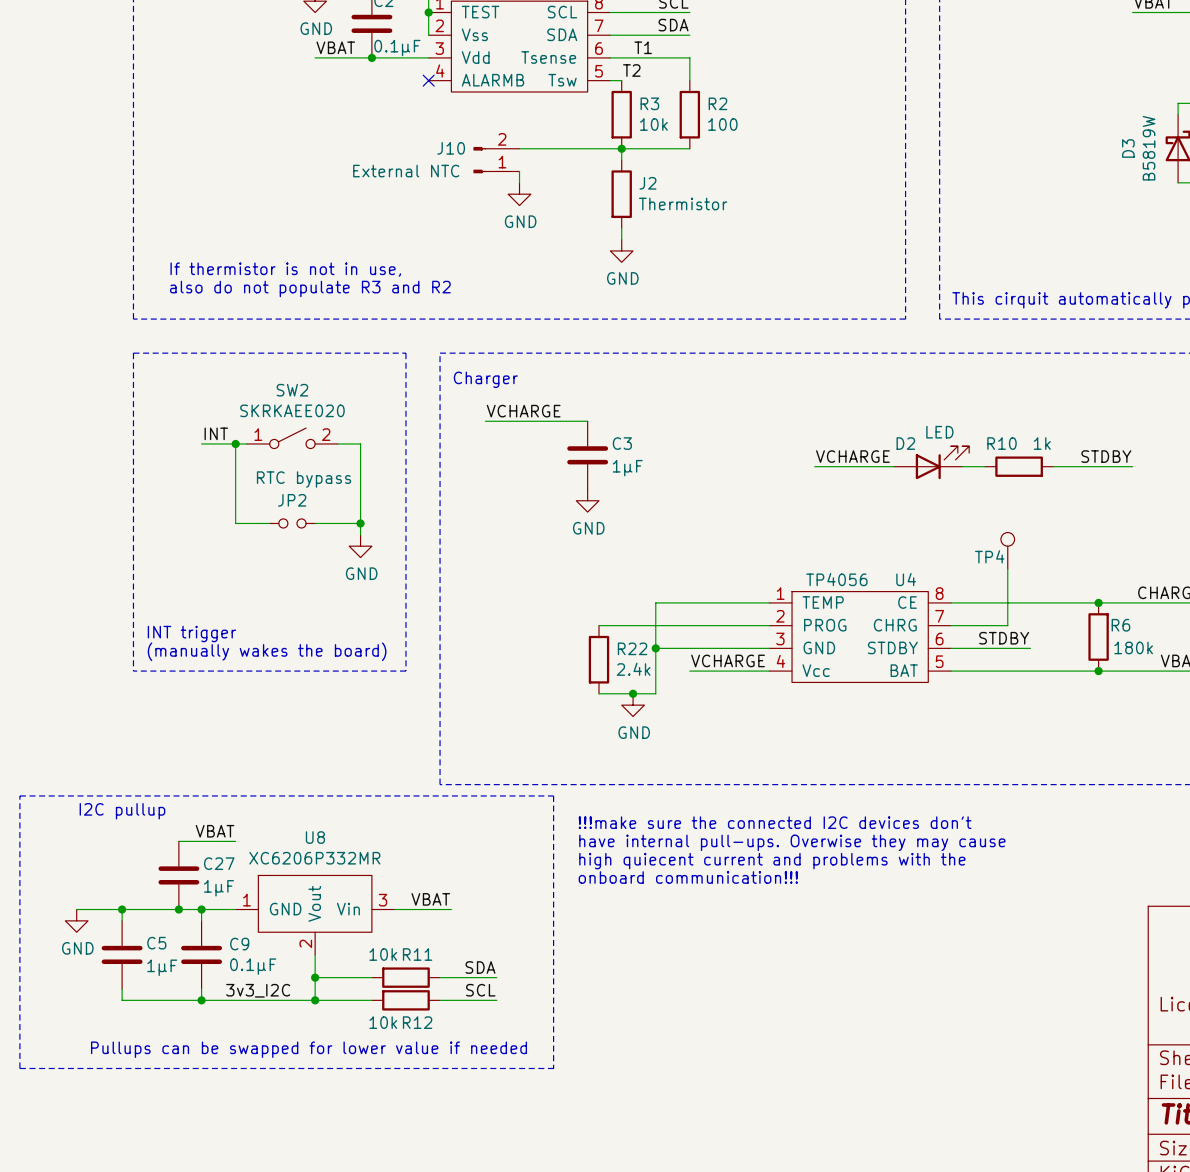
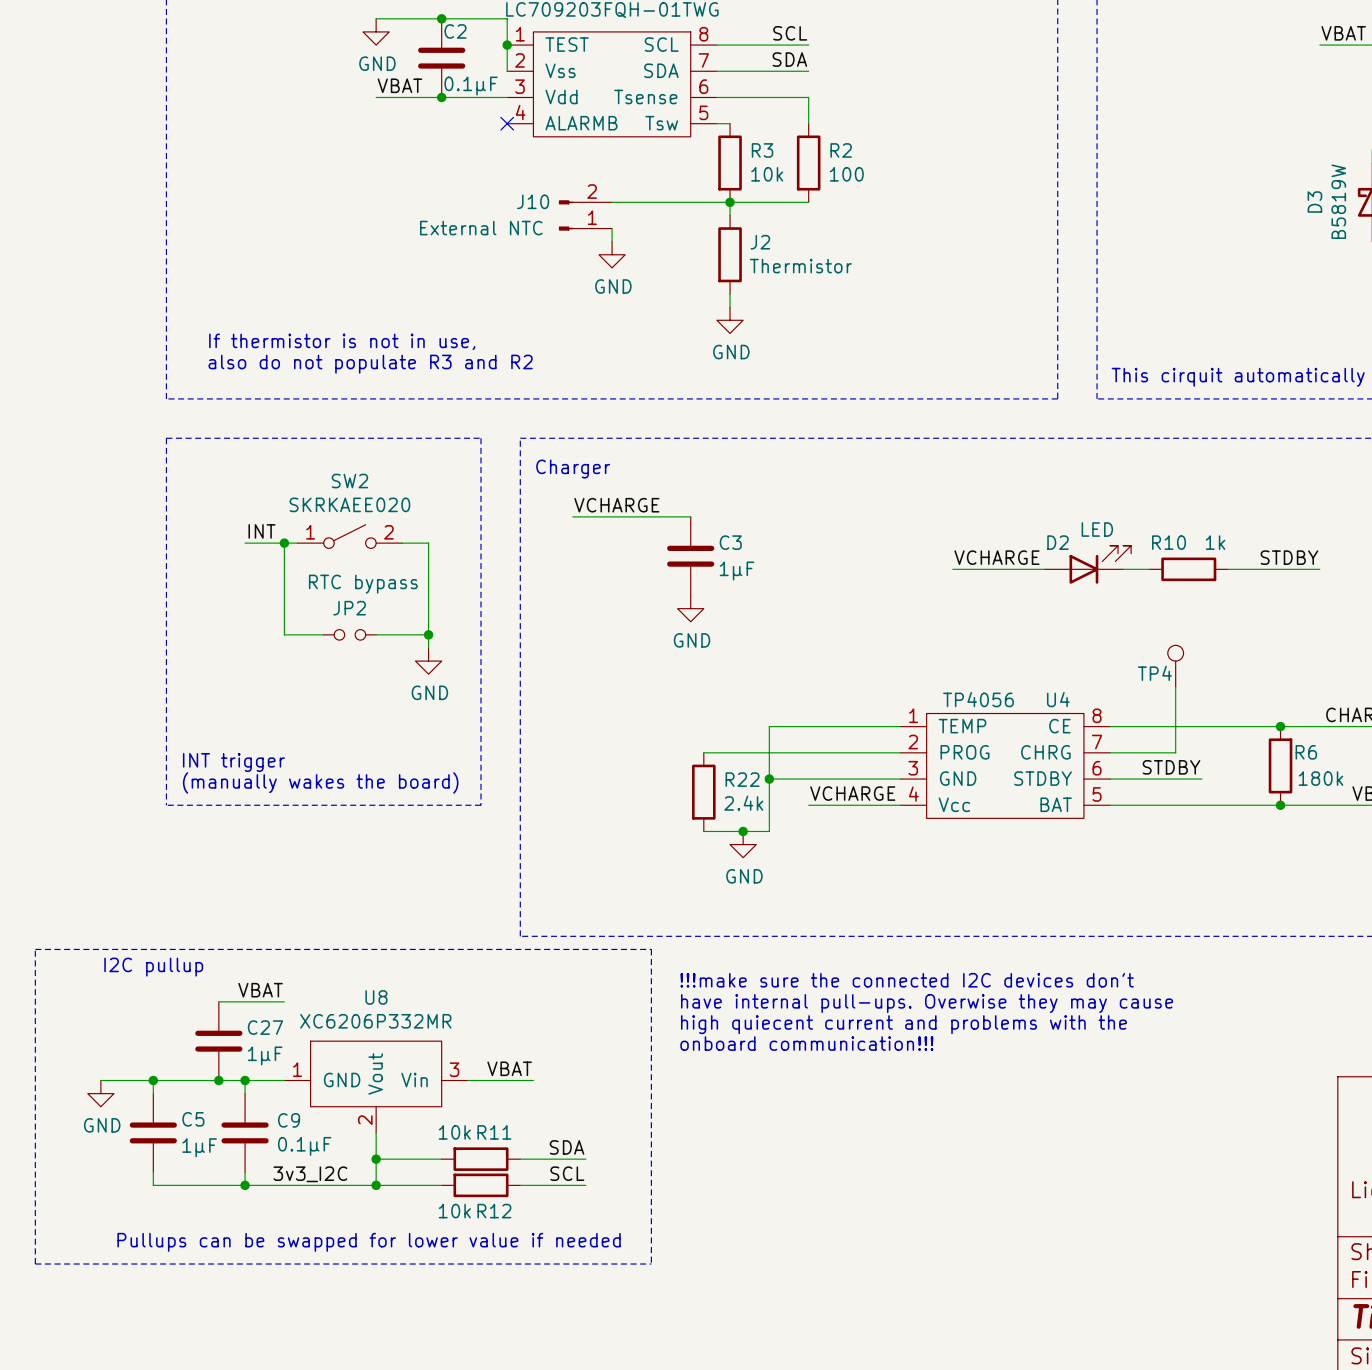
label: T1 (643, 47) -> none
label: T2 (631, 70) -> none

